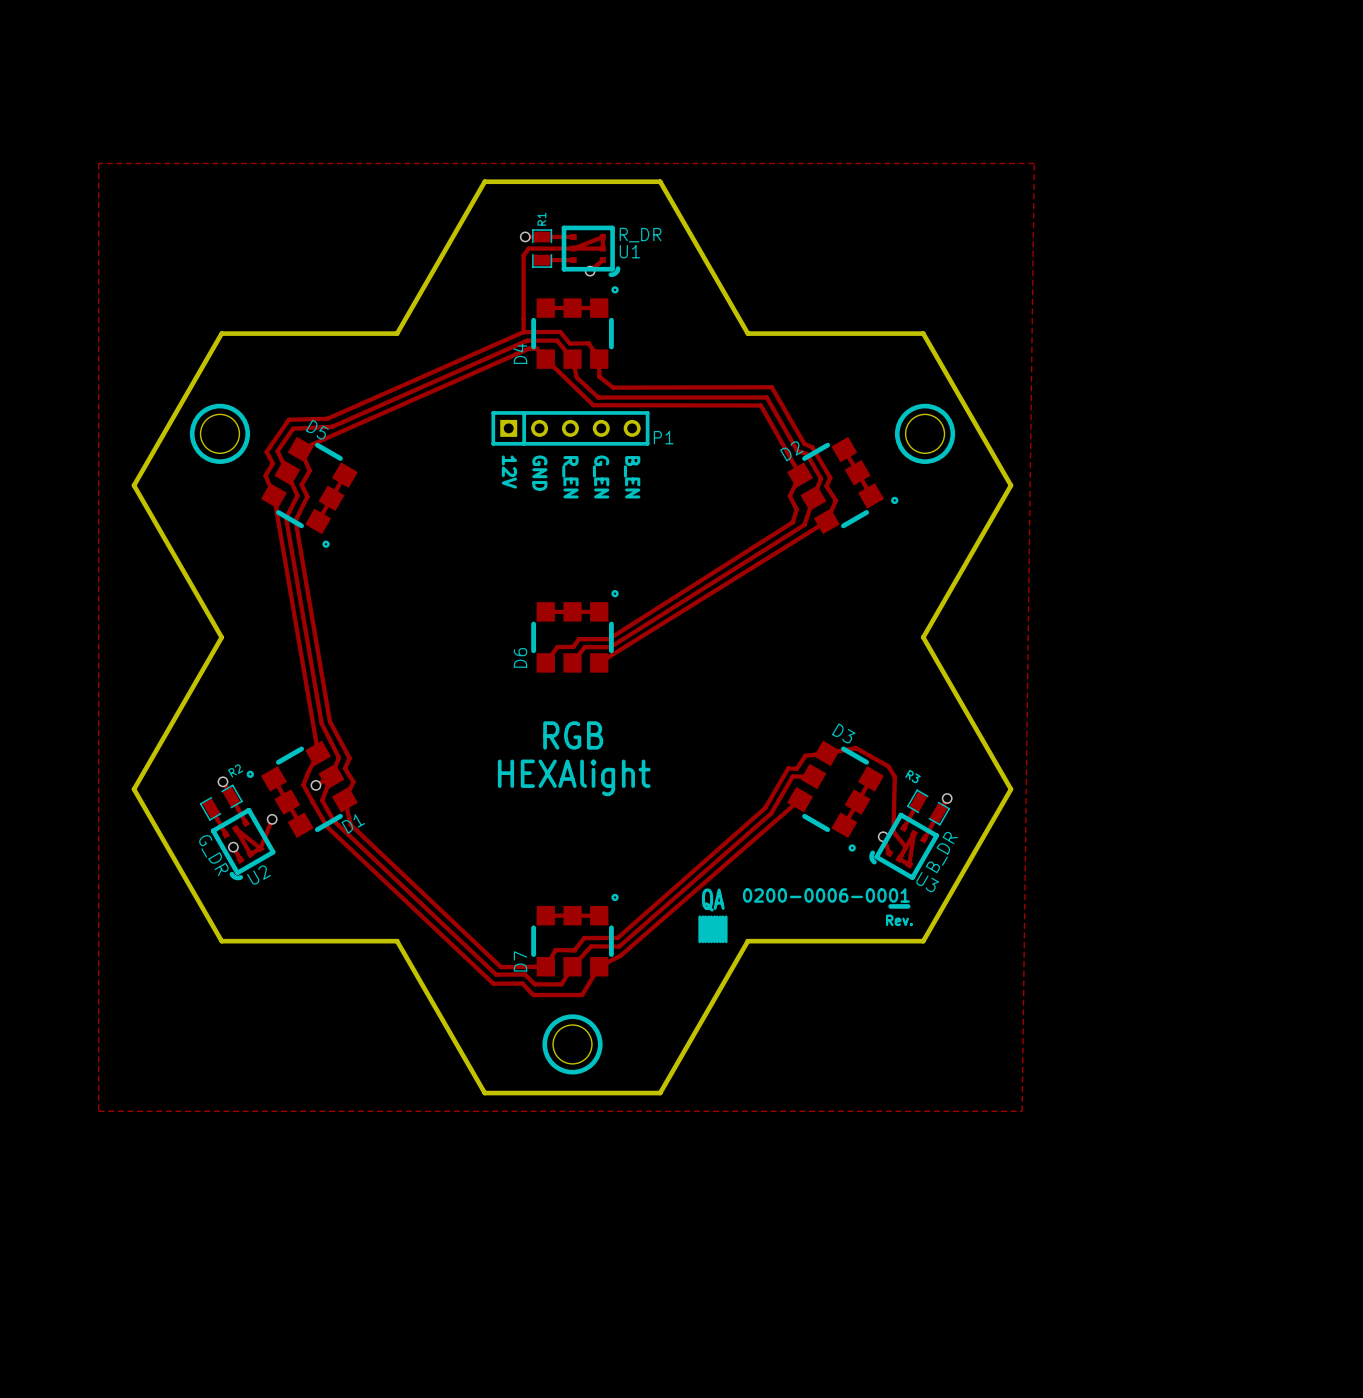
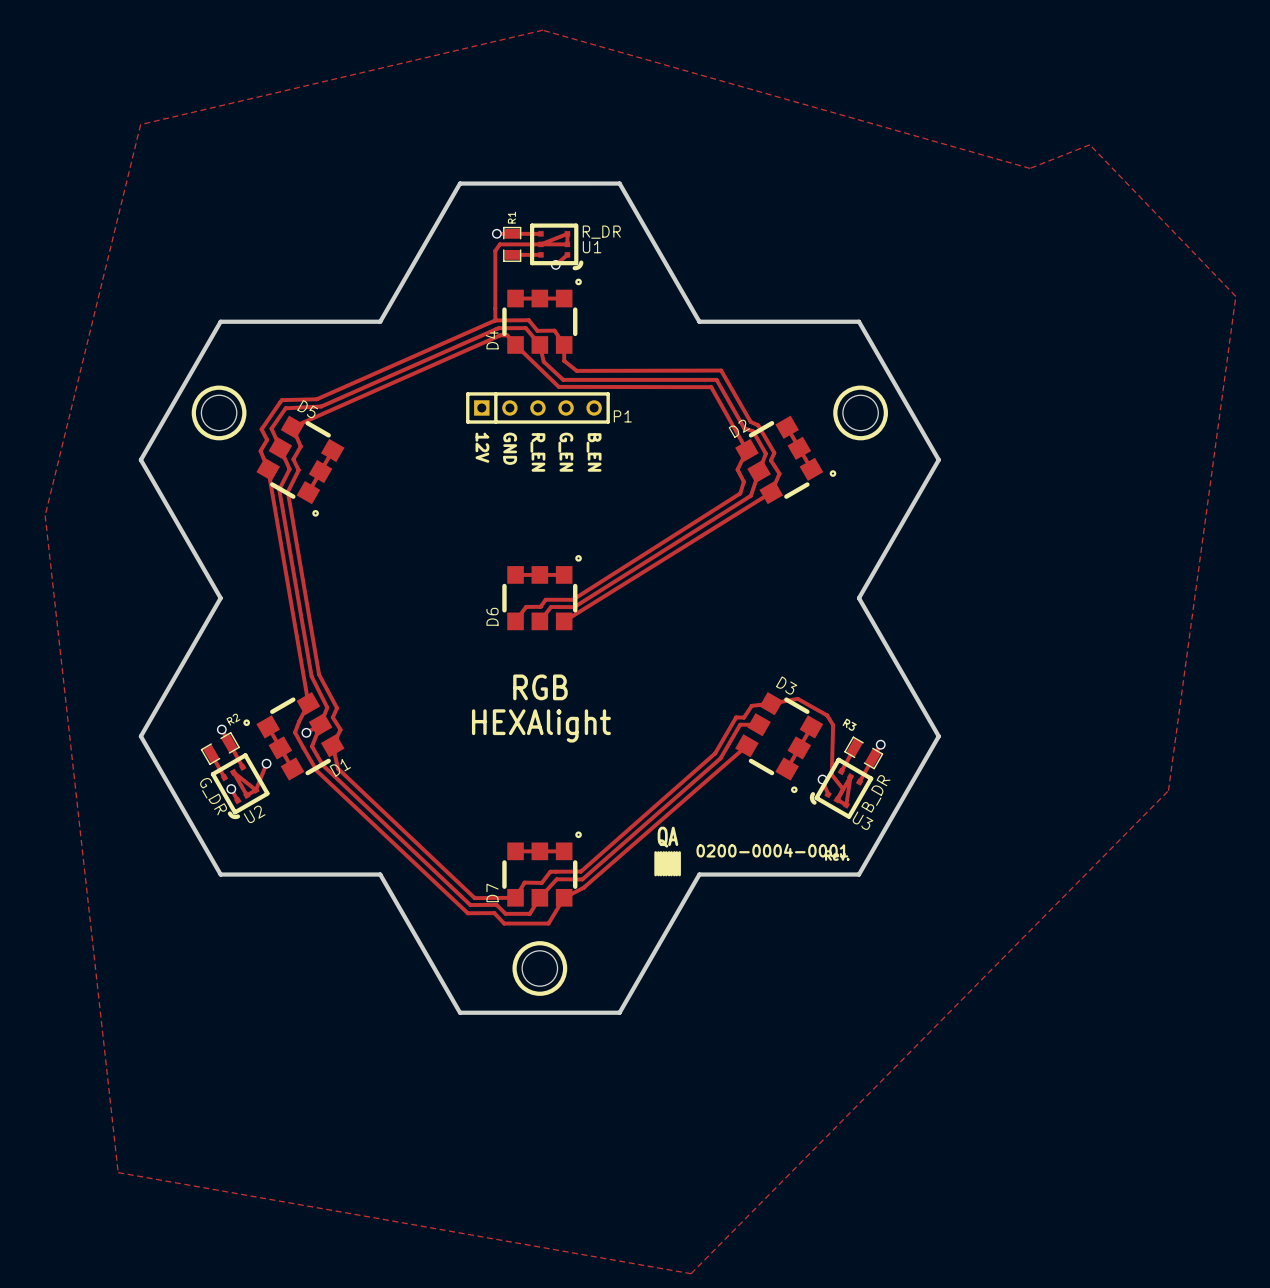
zone outline: none -> (542, 30) (1030, 168) (1089, 144) (1235, 296) (1168, 790) (691, 1273) (118, 1172) (45, 515) (140, 124) (542, 30)
zone outline: (98, 163) (1034, 163) (1022, 1111) (98, 1111) (98, 163) -> none
text: 0200-0006-0001 (826, 895) -> 0200-0004-0001 (772, 850)
line: (890, 906) (908, 906) -> none

